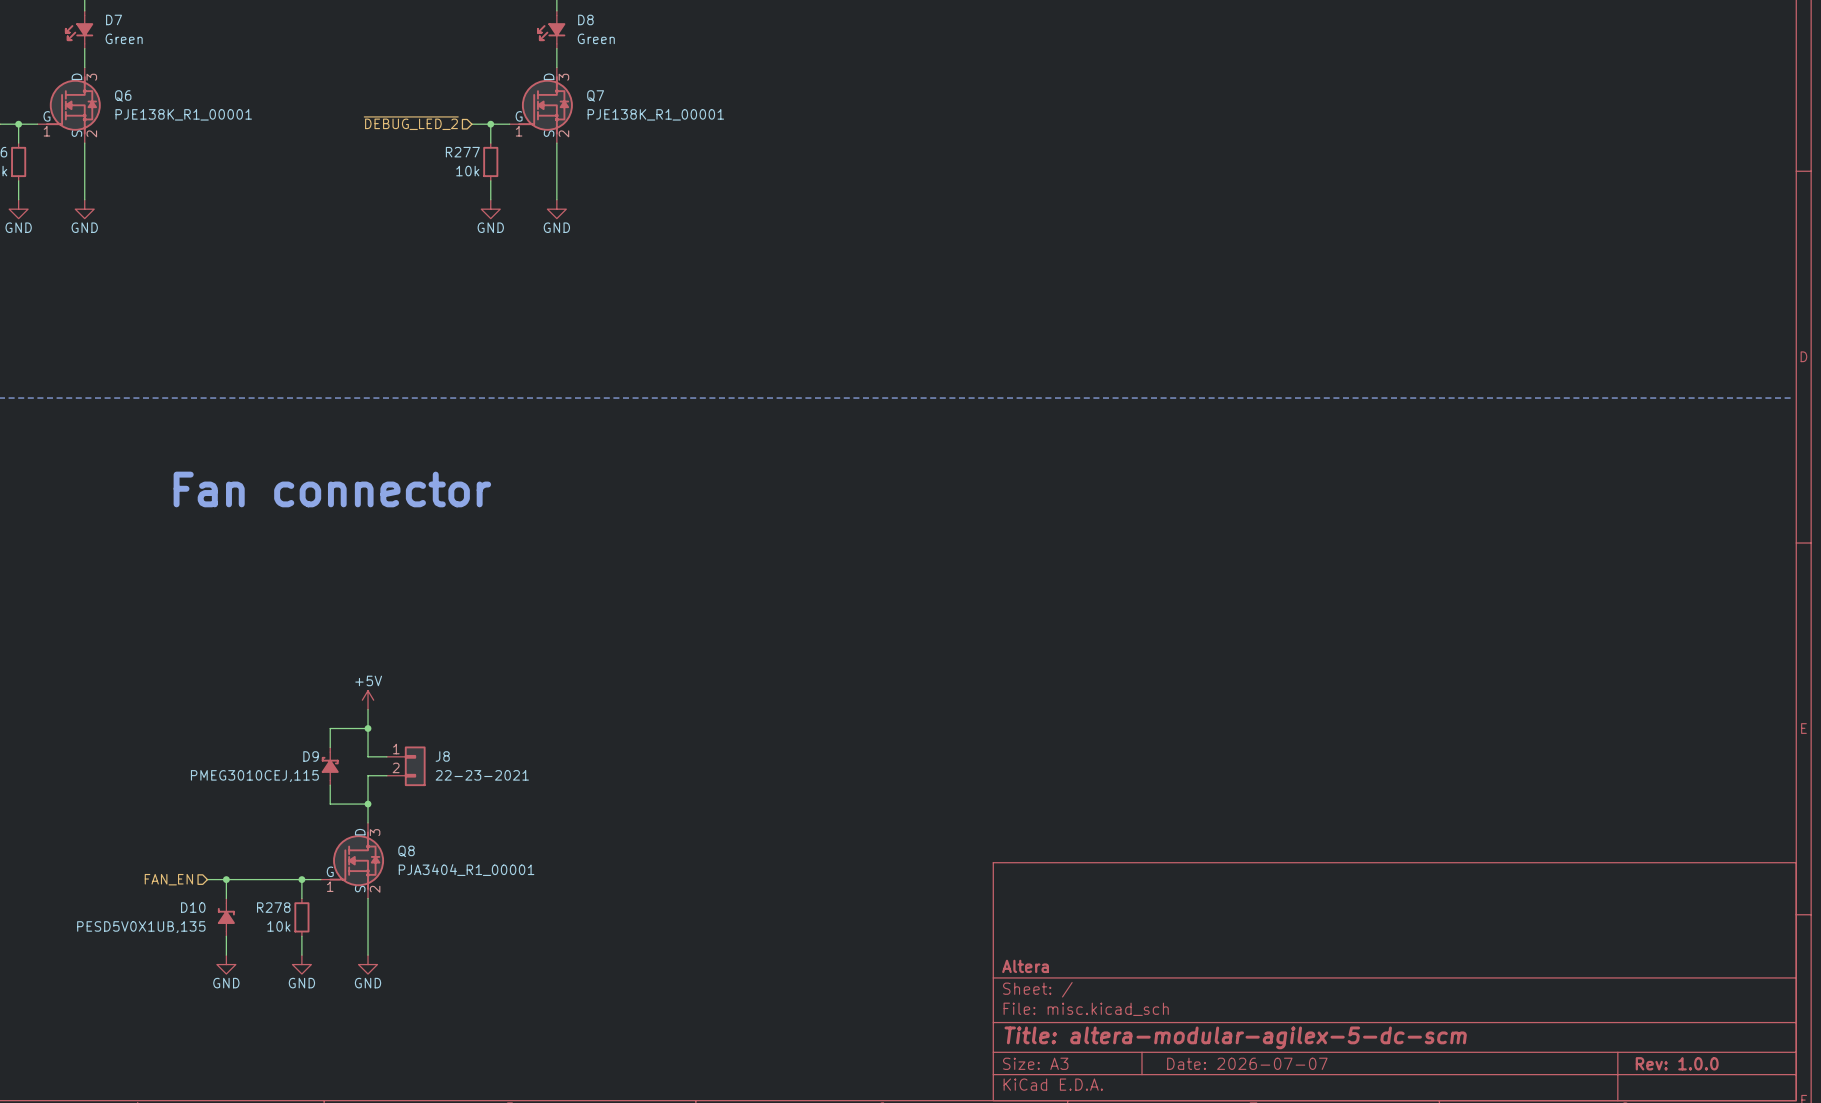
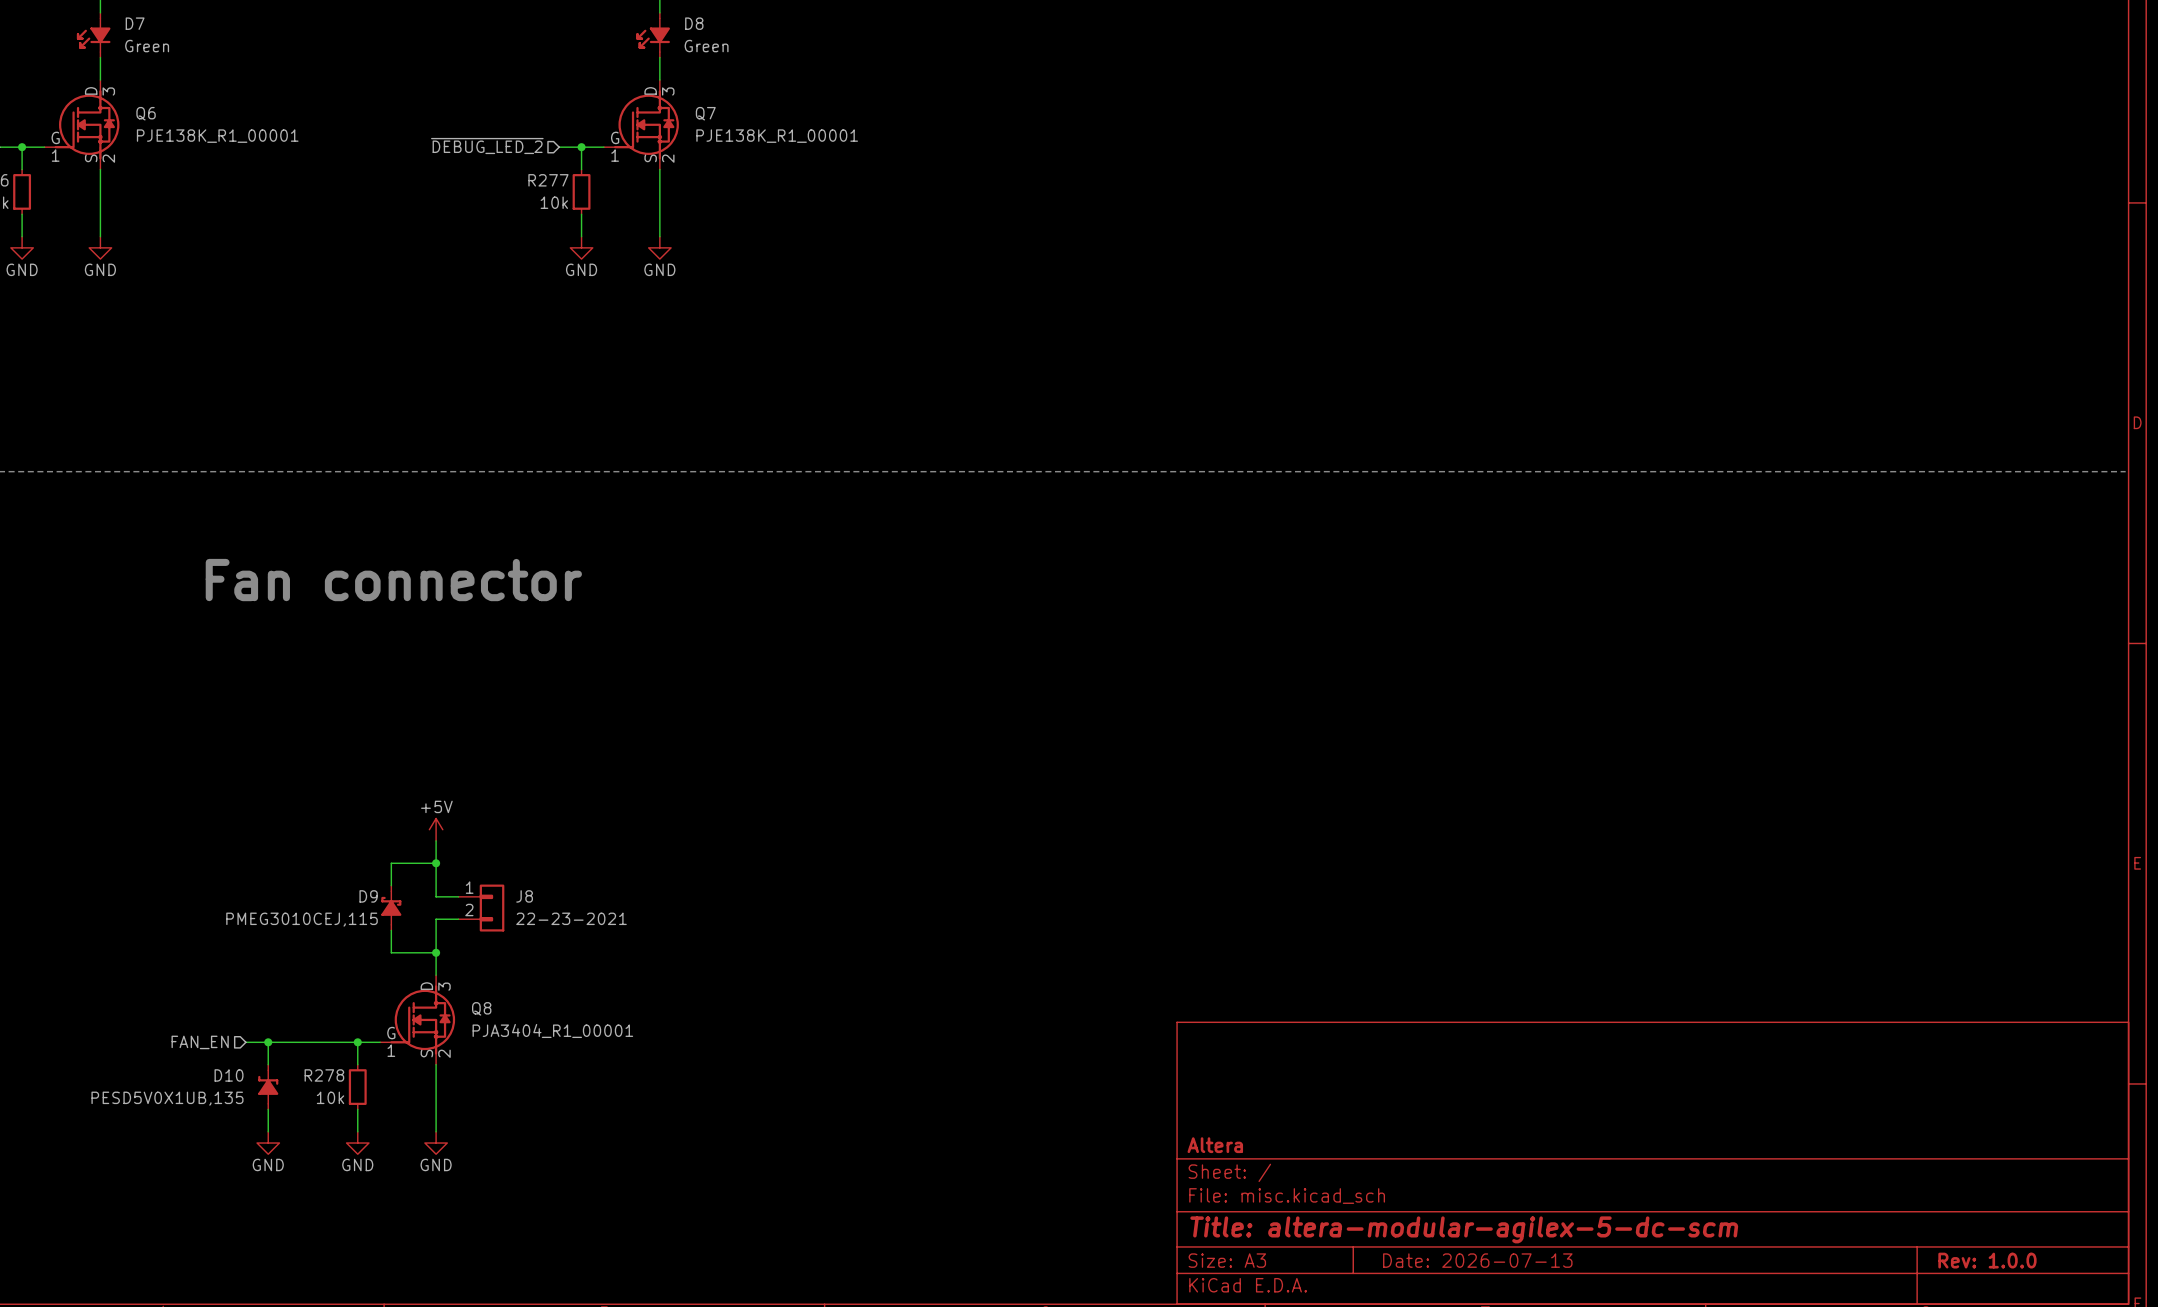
title block: Date: 2026-07-07 (1247, 1063) -> Date: 2026-07-13 (1477, 1260)

